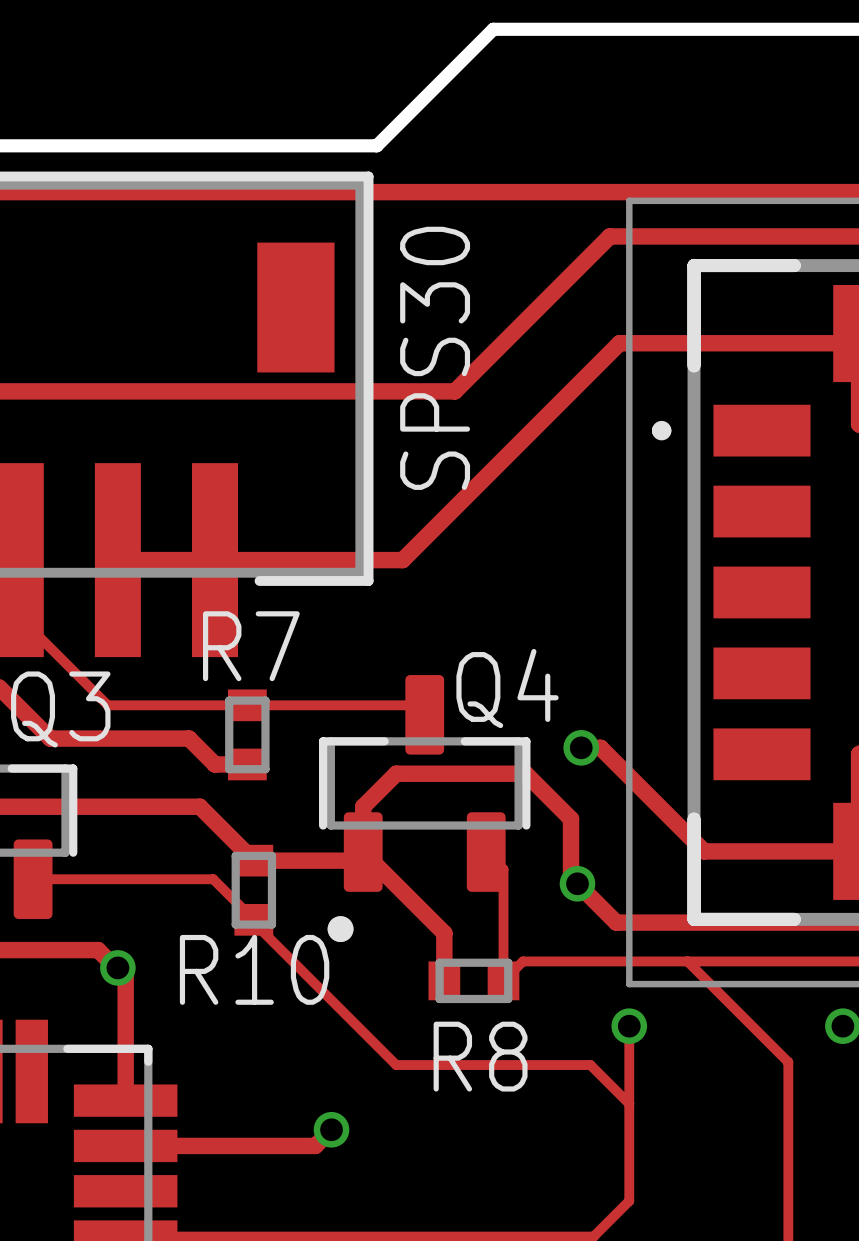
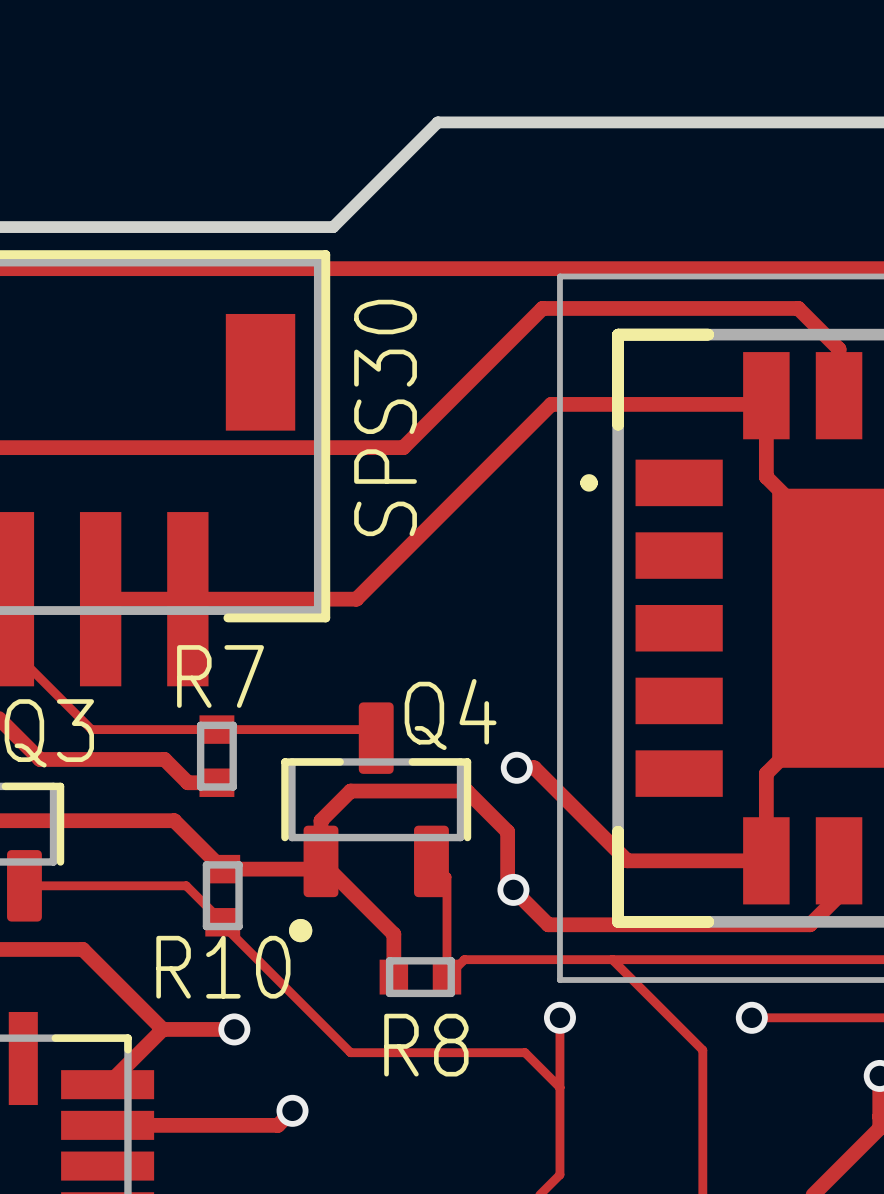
track: (115, 967) (125, 975) (125, 1100) -> (98, 965) (162, 1029)
via position: (117, 967) -> (234, 1029)
track: none -> (162, 1029) (107, 1084)
track: none -> (162, 1029) (234, 1029)

